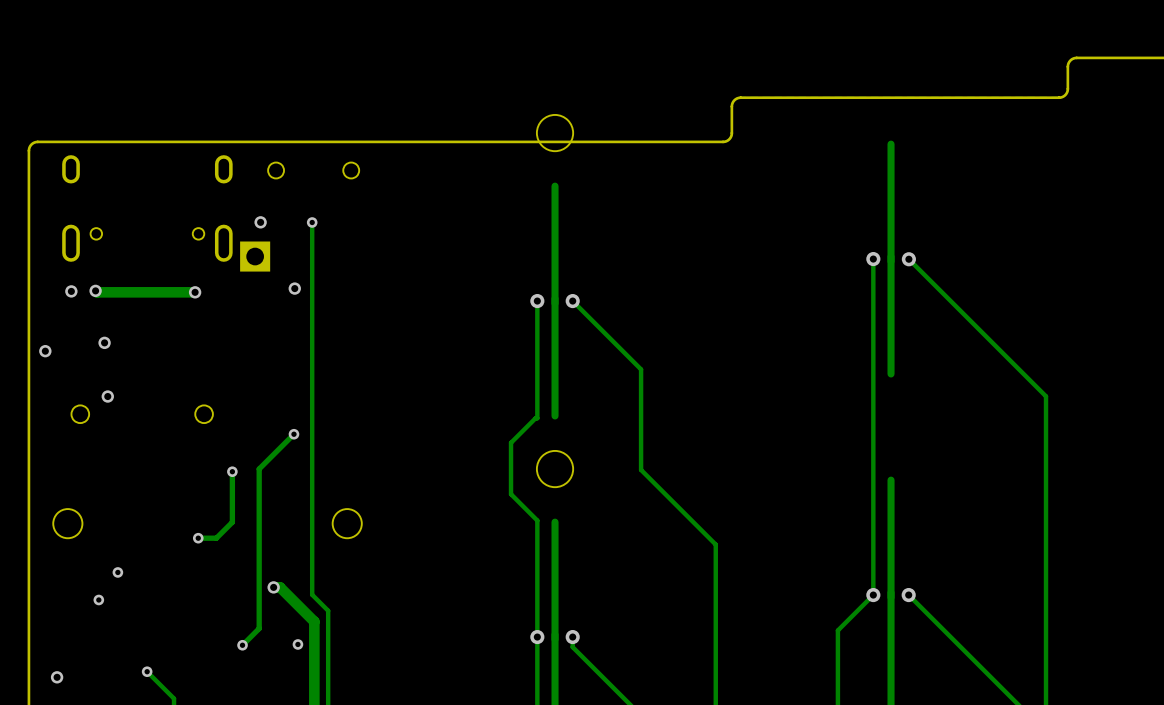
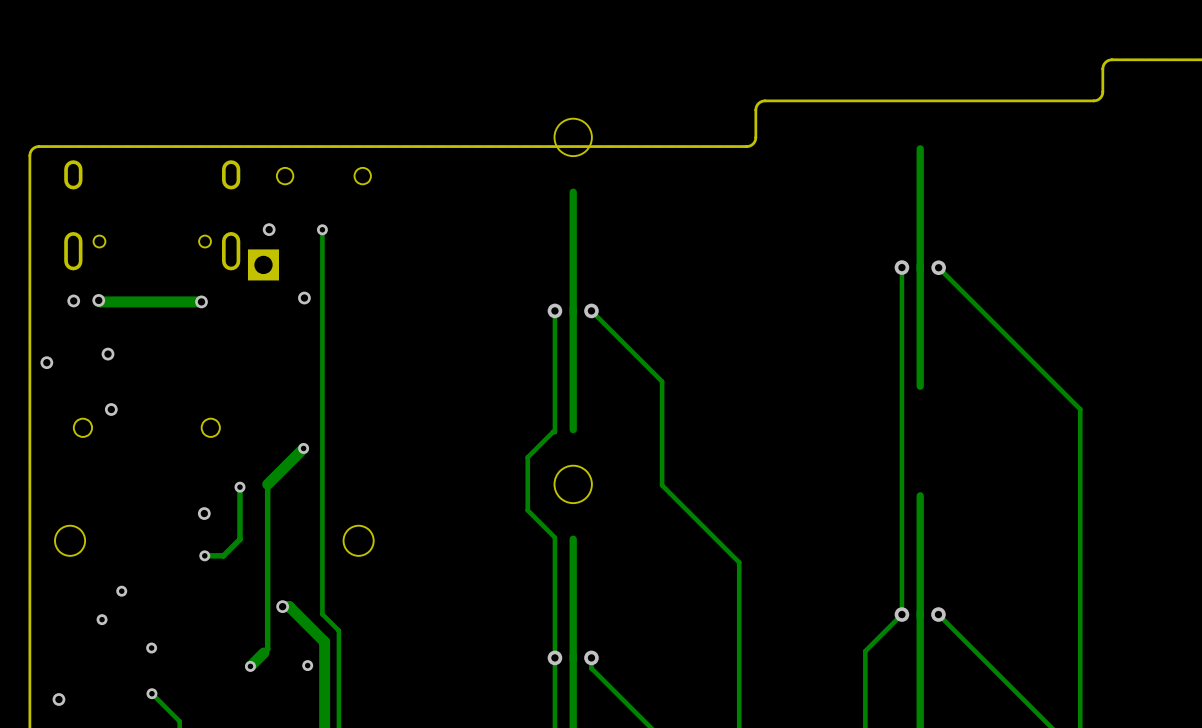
track width: thin (293, 434) (259, 469) -> thick (303, 448) (267, 484)
via: none -> (204, 513)
via: none -> (151, 648)
track width: thin (255, 632) (242, 645) -> thick (263, 653) (250, 666)

